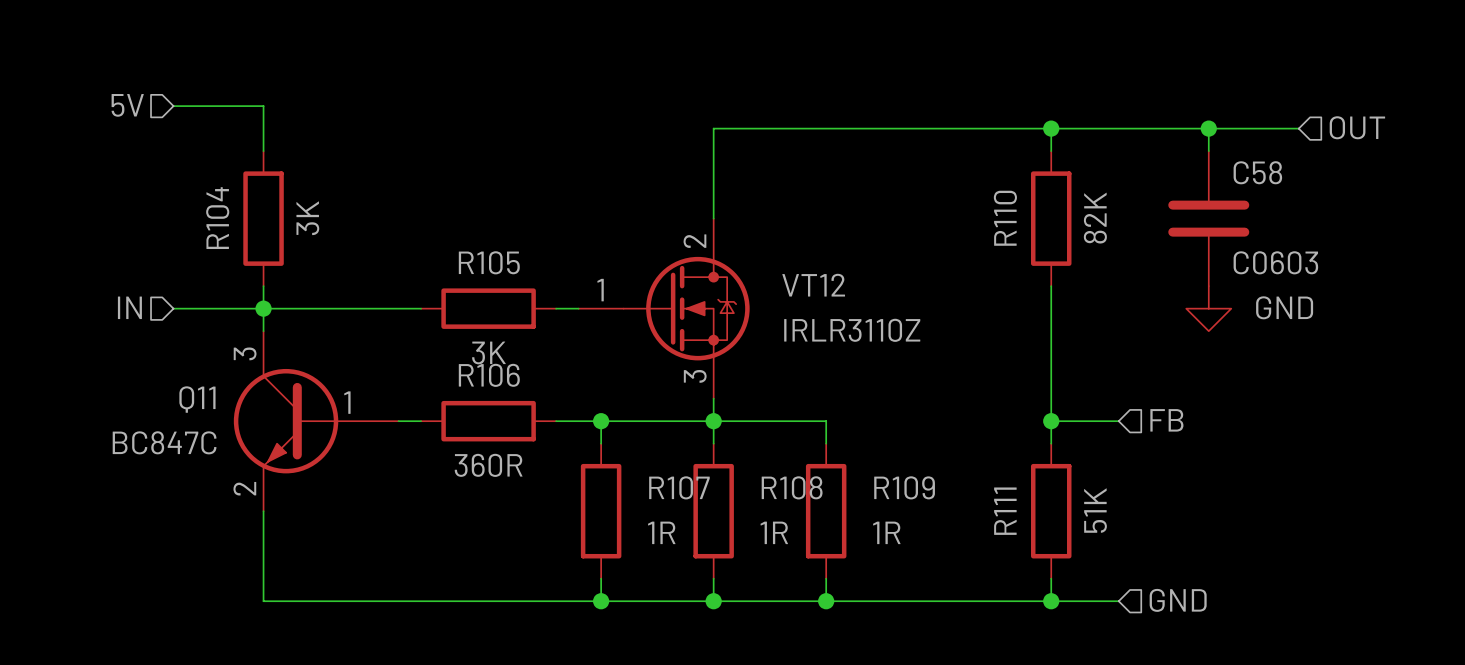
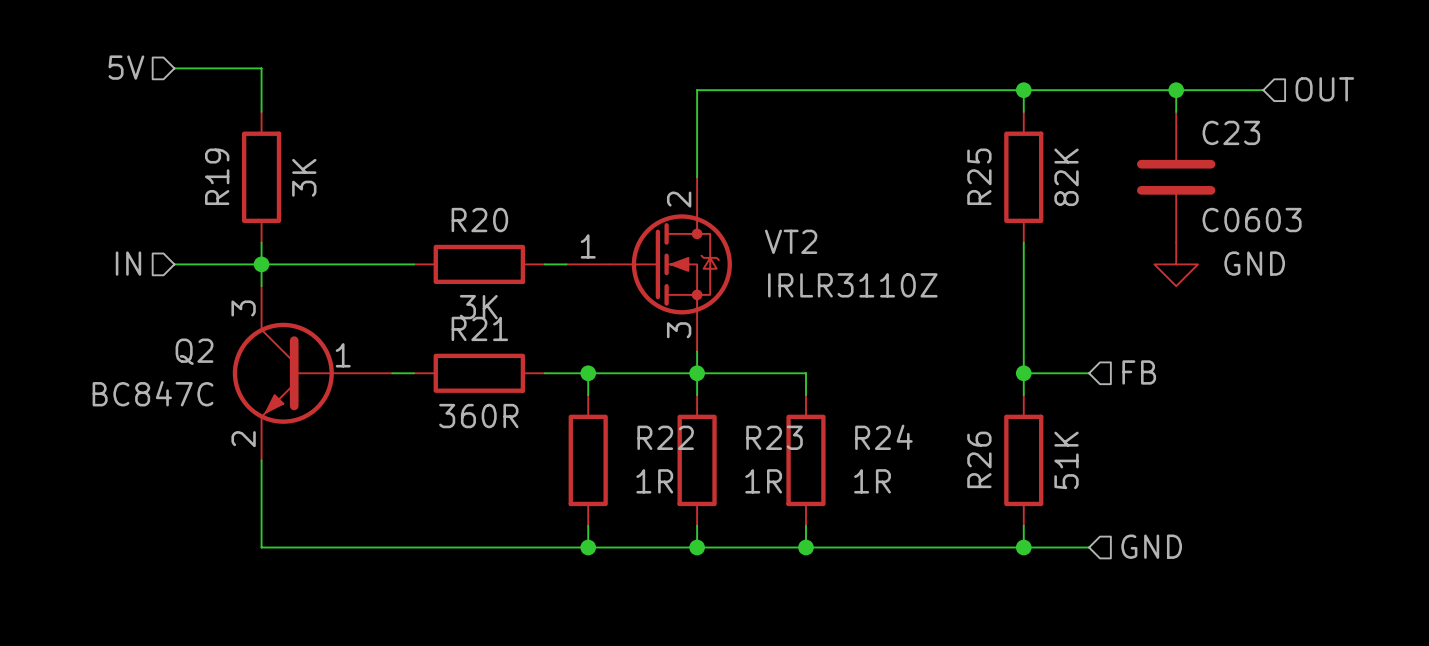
C58 name: C58 (1257, 172) -> C23 (1231, 132)
R104 name: R104 (217, 218) -> R19 (217, 176)
R110 name: R110 (1005, 218) -> R25 (979, 176)
R105 name: R105 (489, 262) -> R20 (479, 220)
VT12 name: VT12 (813, 285) -> VT2 (791, 241)
R106 name: R106 (489, 375) -> R21 (479, 328)
Q11 name: Q11 (197, 399) -> Q2 (194, 351)
R107 name: R107 (679, 487) -> R22 (665, 437)
R108 name: R108 (792, 487) -> R23 (774, 437)
R109 name: R109 (904, 487) -> R24 (883, 437)
R111 name: R111 (1005, 511) -> R26 (979, 459)

